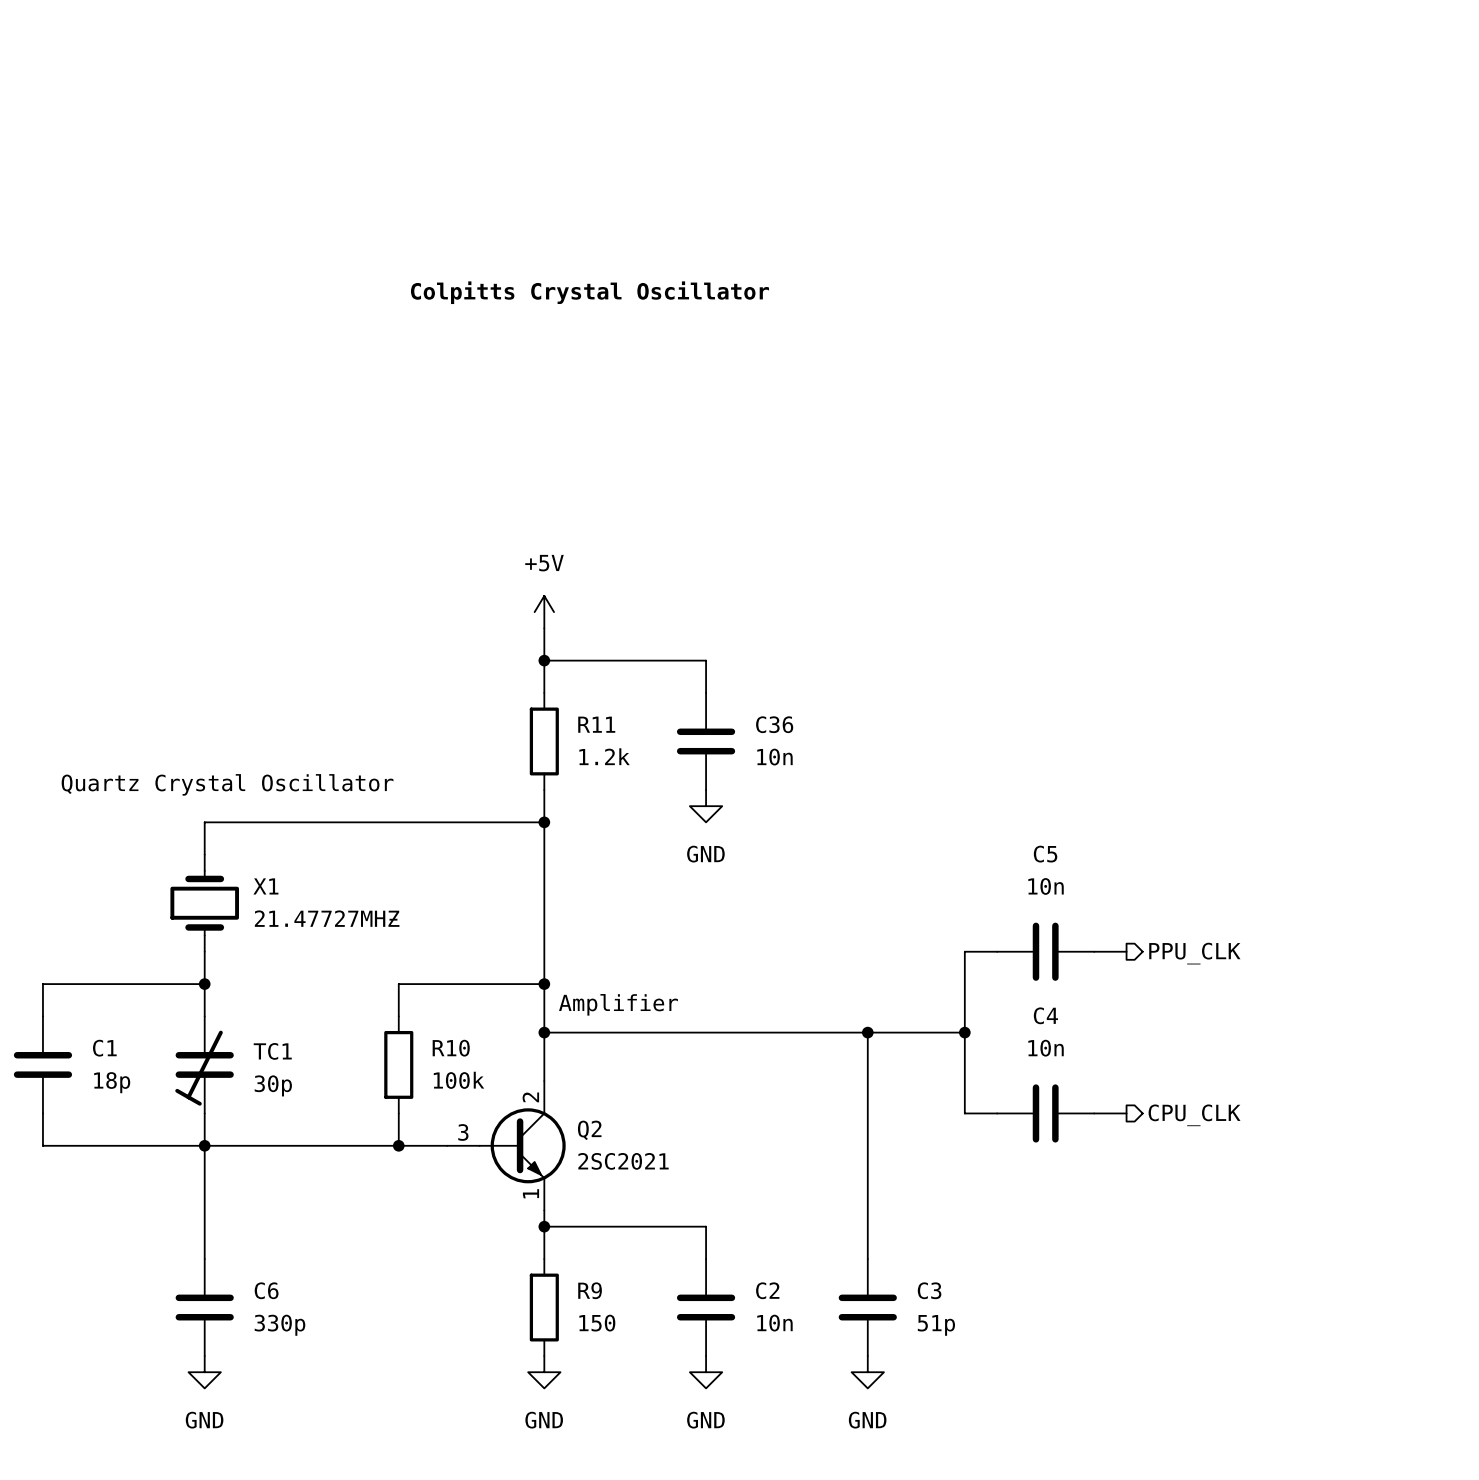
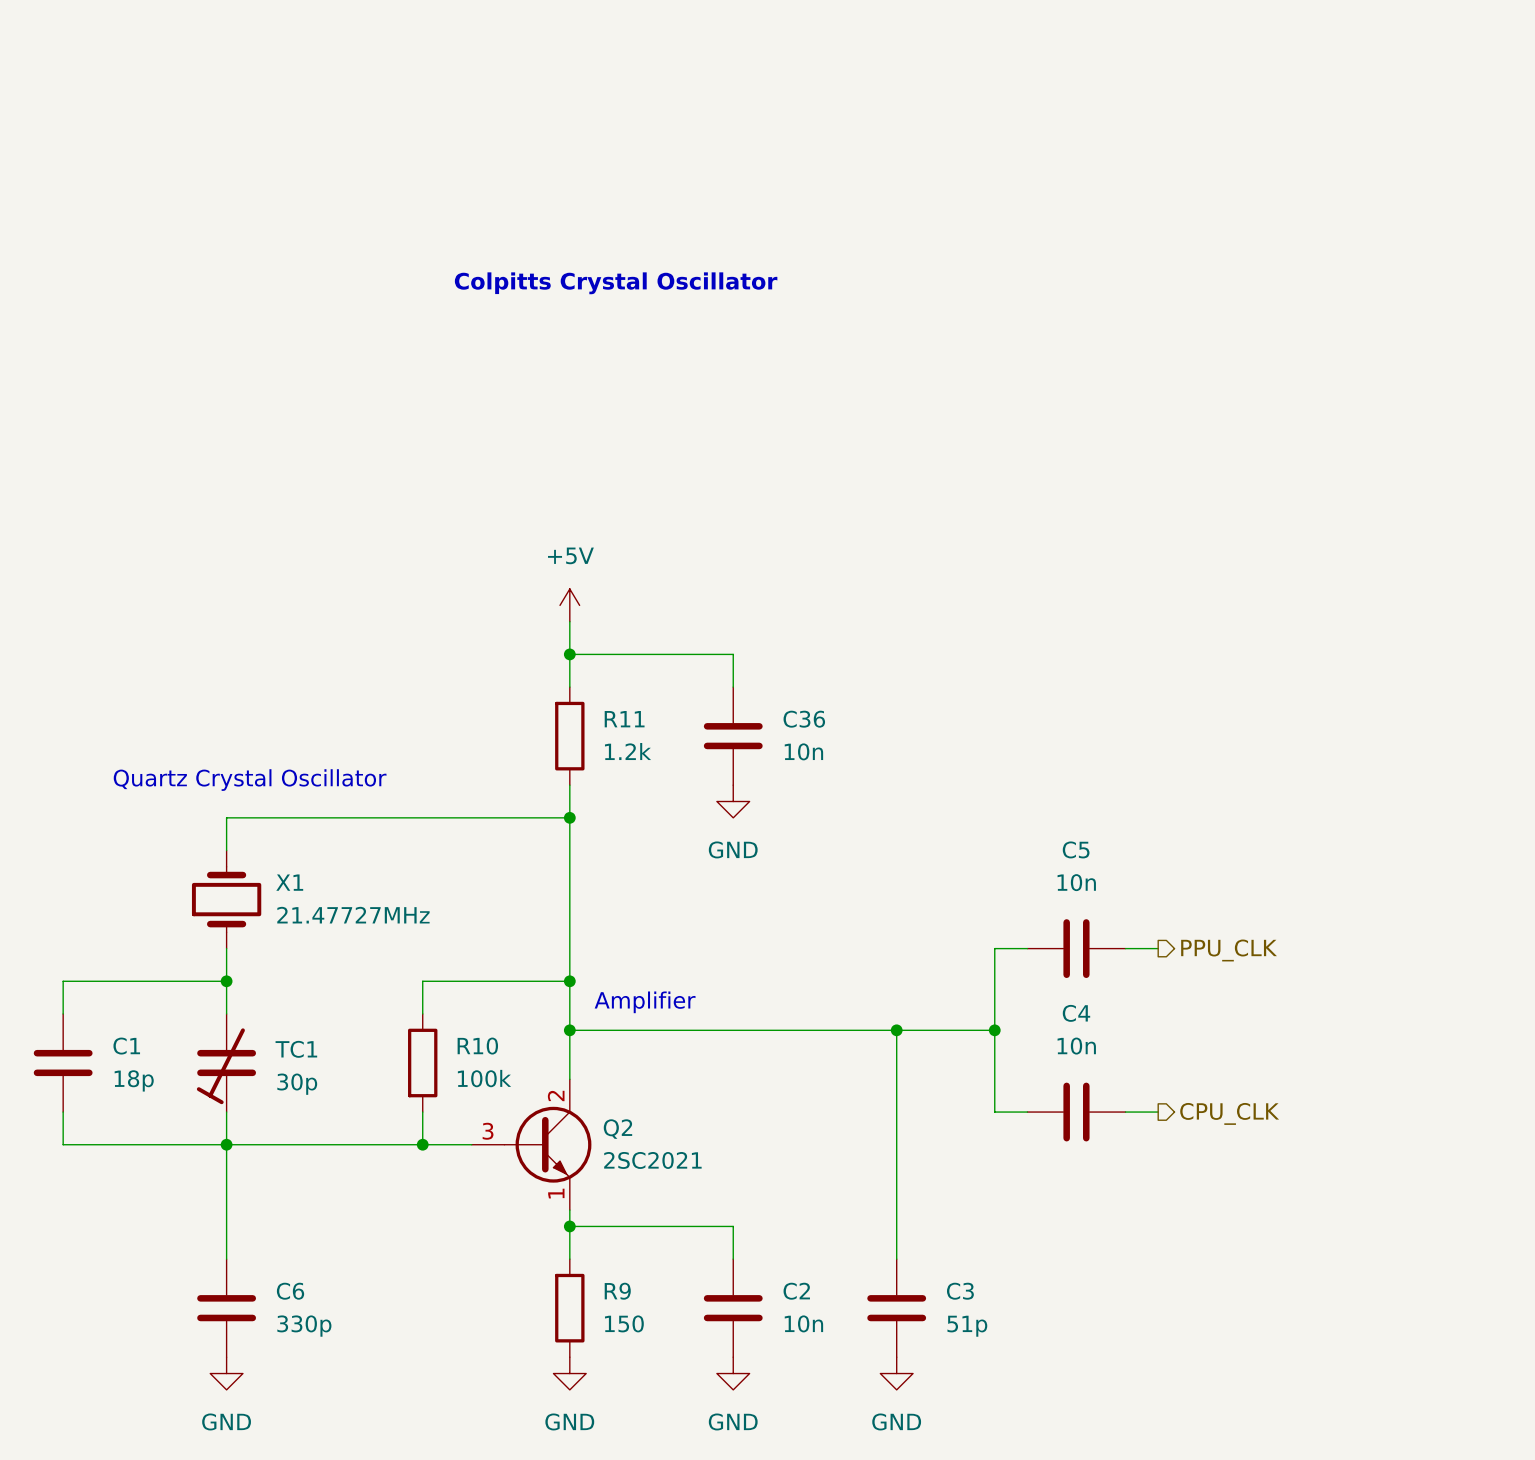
X1 value: 21.47727MHƵ (327, 918) -> 21.47727MHz (353, 915)

